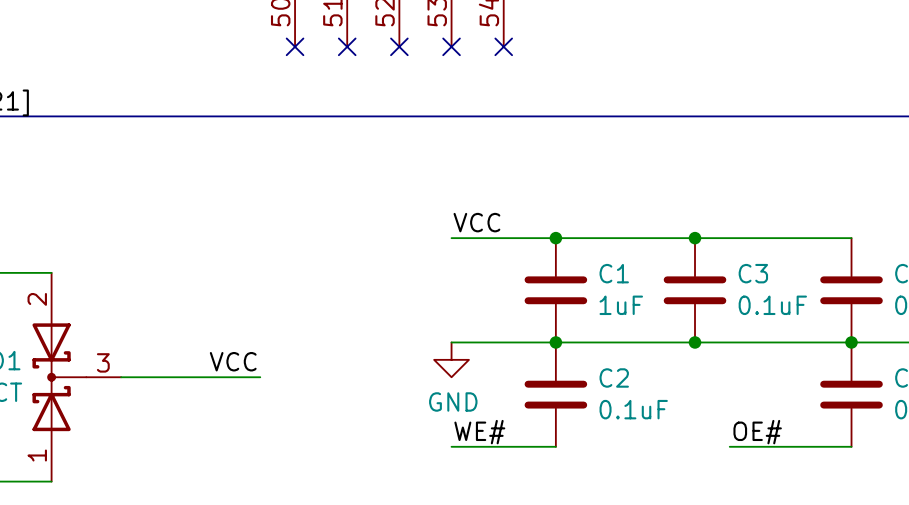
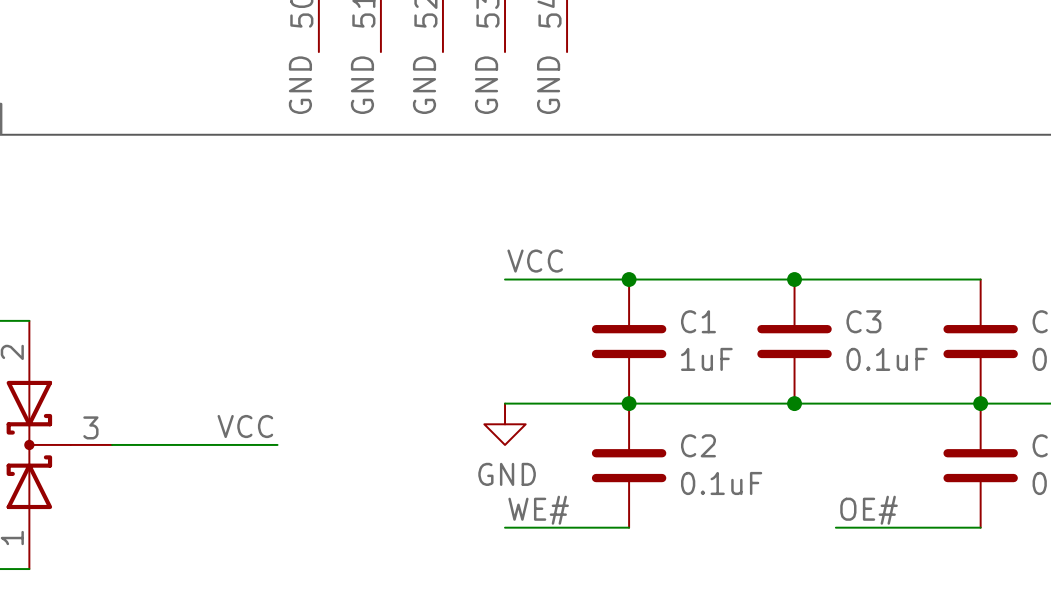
no-connect mark: (295, 46) -> none
no-connect mark: (347, 46) -> none
no-connect mark: (399, 46) -> none
no-connect mark: (451, 46) -> none
no-connect mark: (503, 46) -> none
label: none -> GND (300, 85)
label: none -> GND (362, 85)
label: none -> GND (424, 85)
label: none -> GND (486, 85)
label: none -> GND (548, 85)

